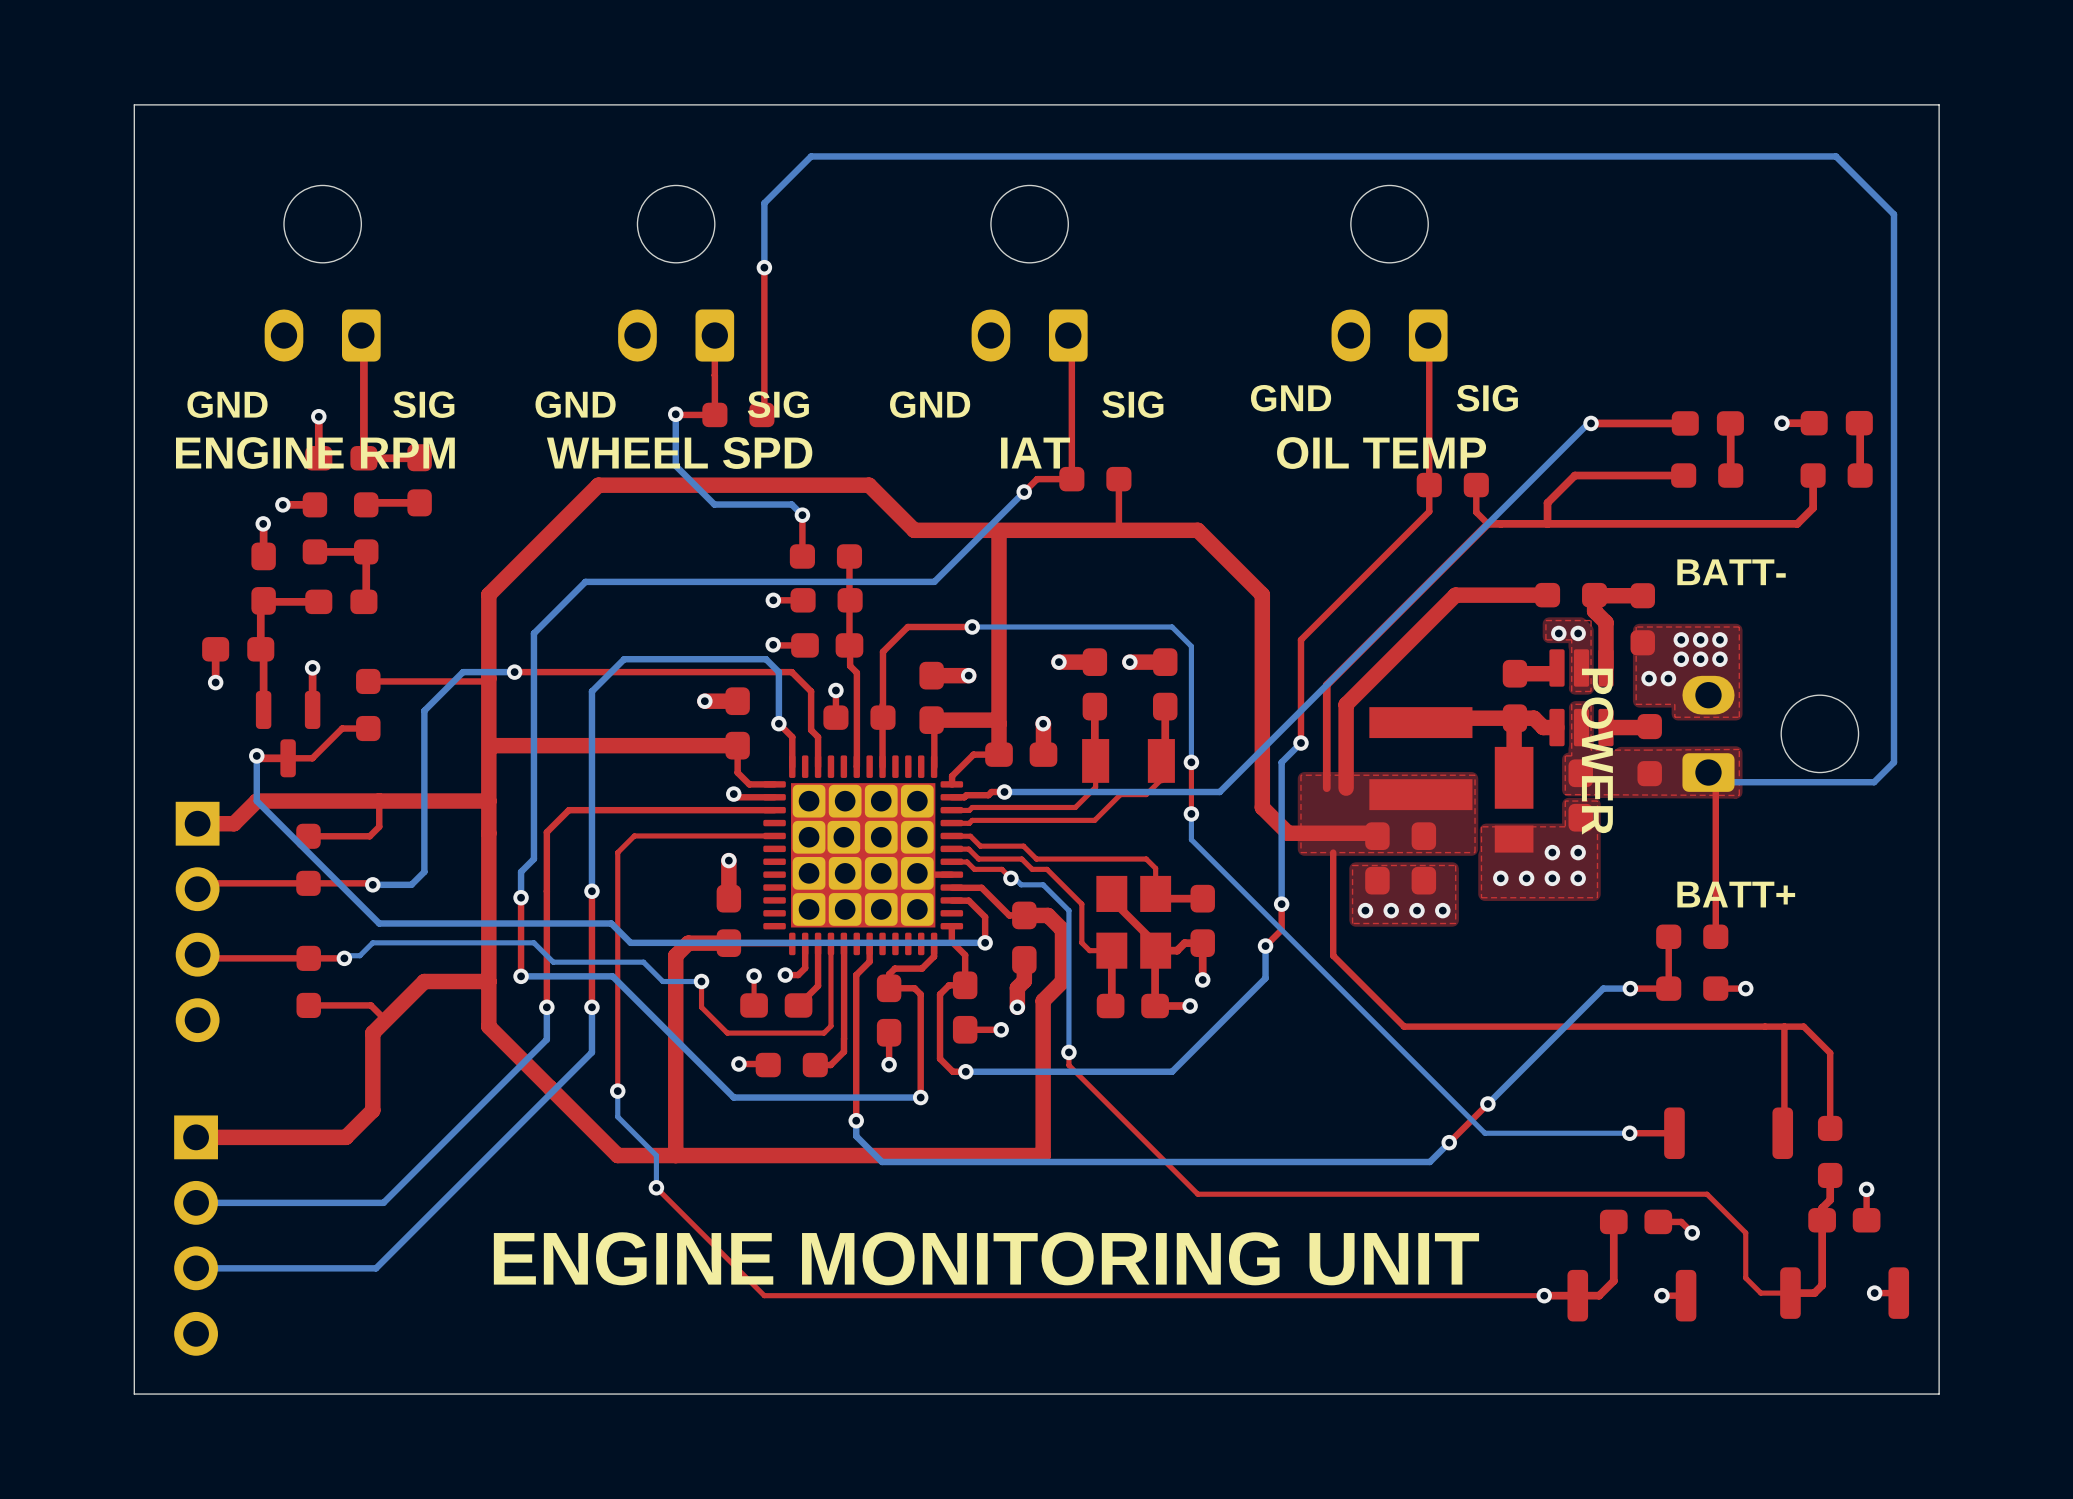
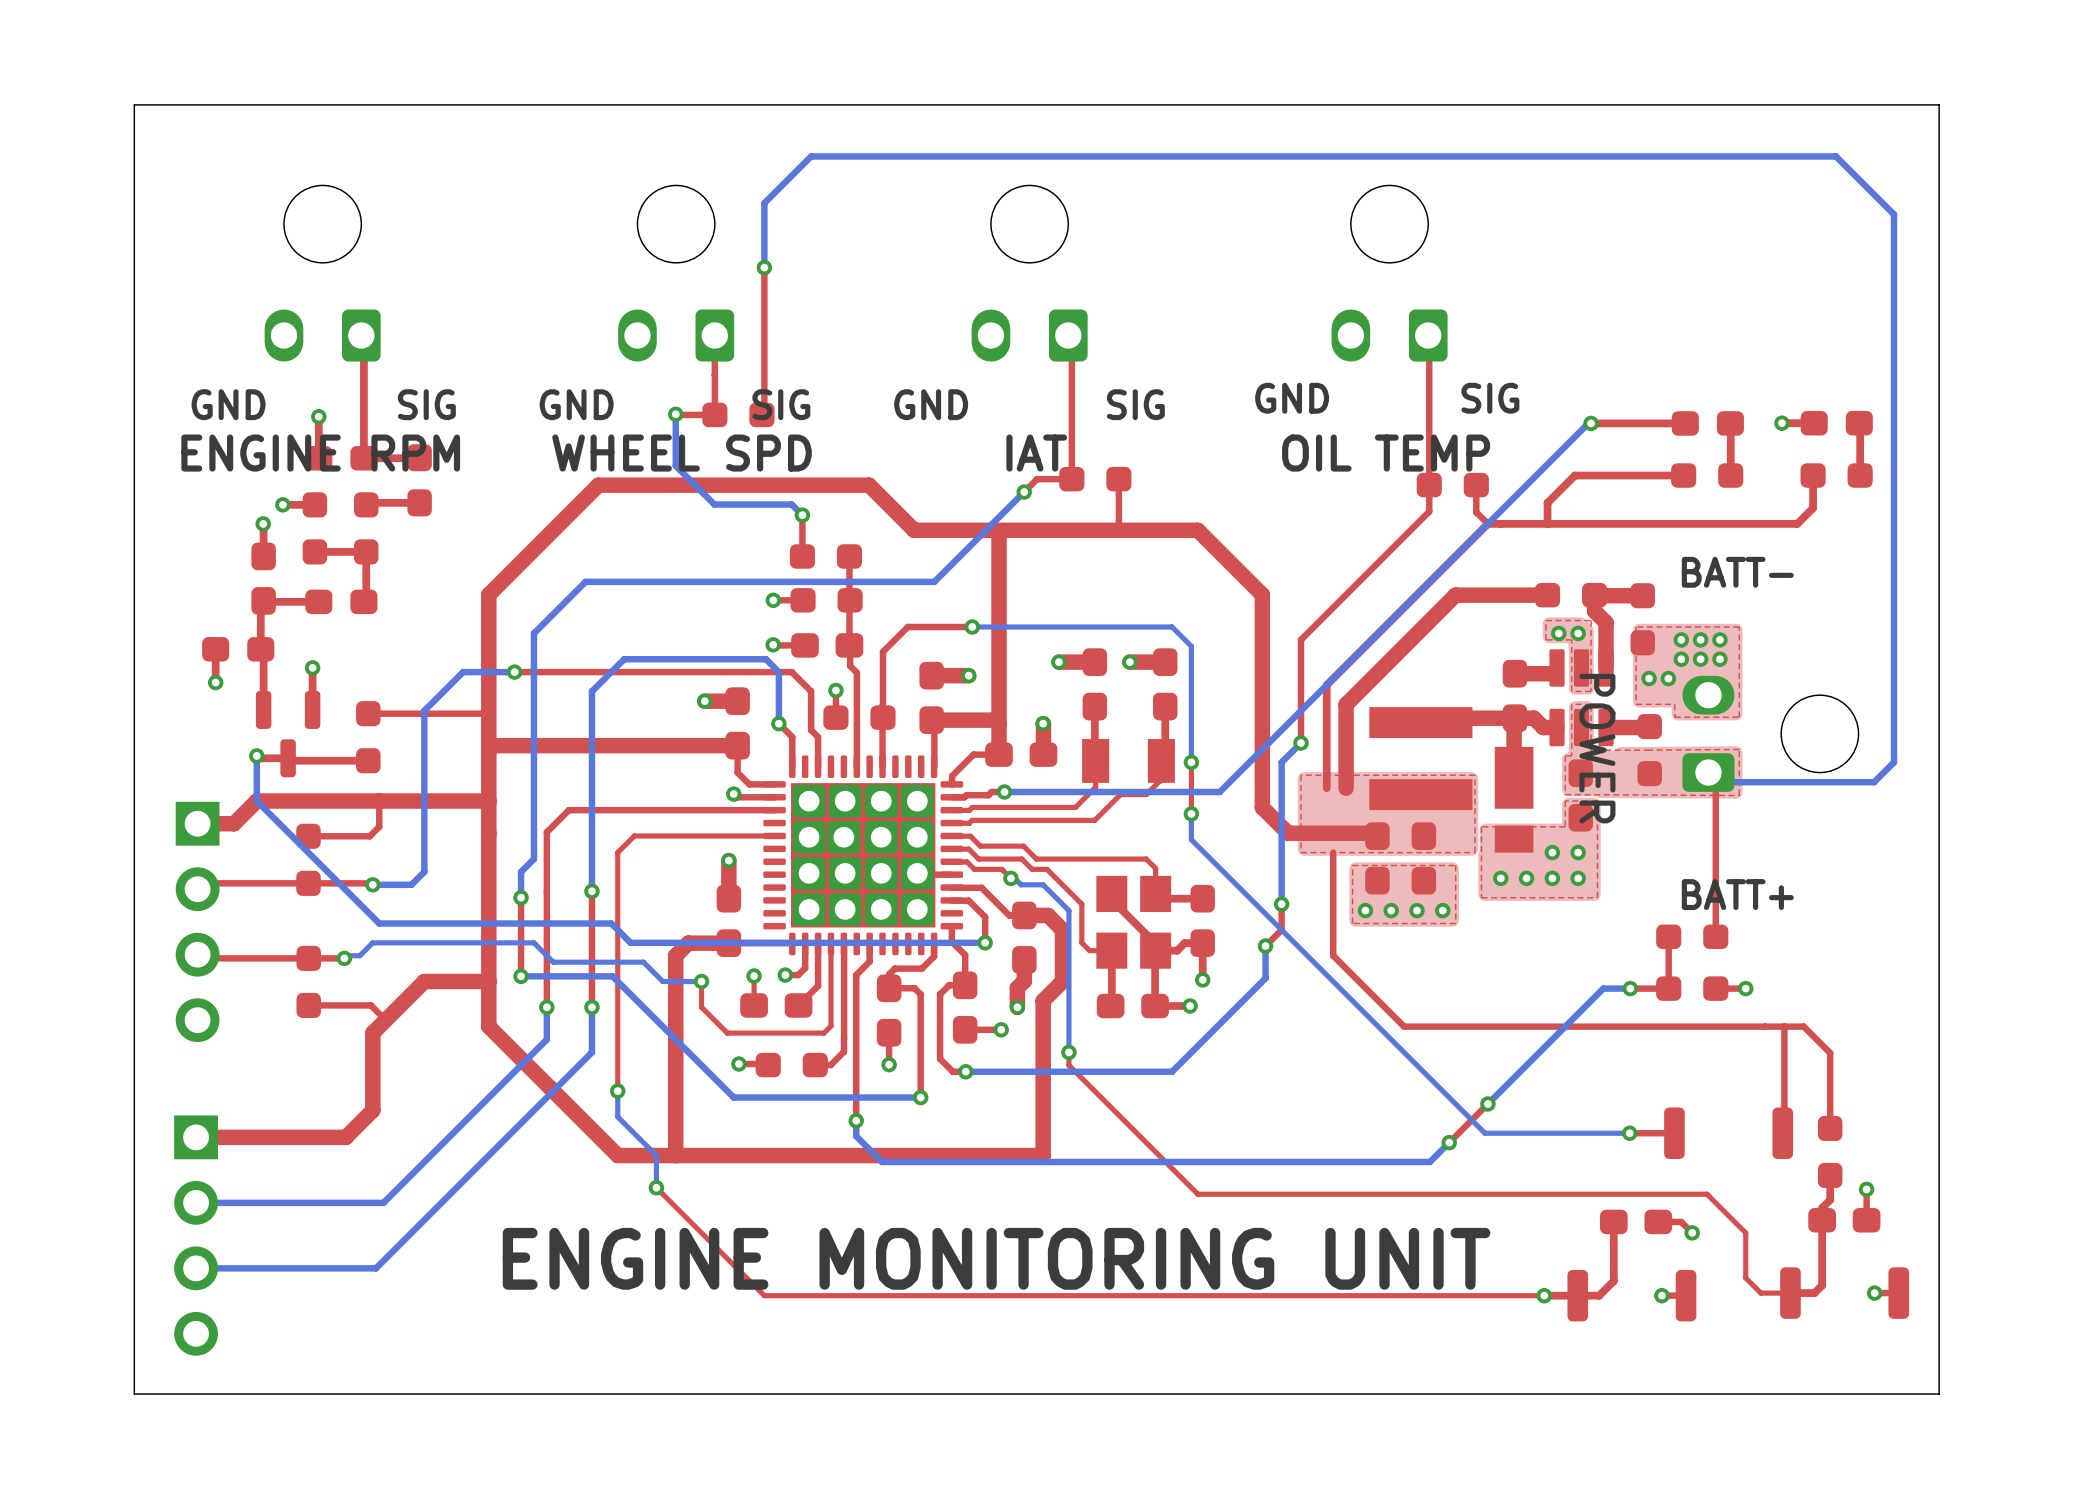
top track: (485, 681) (368, 681) -> (485, 713) (368, 713)
part position: (368, 704) -> (368, 737)
top track: (368, 728) (342, 728) (312, 758) (288, 758) -> none
top track: none -> (368, 760) (290, 760)

